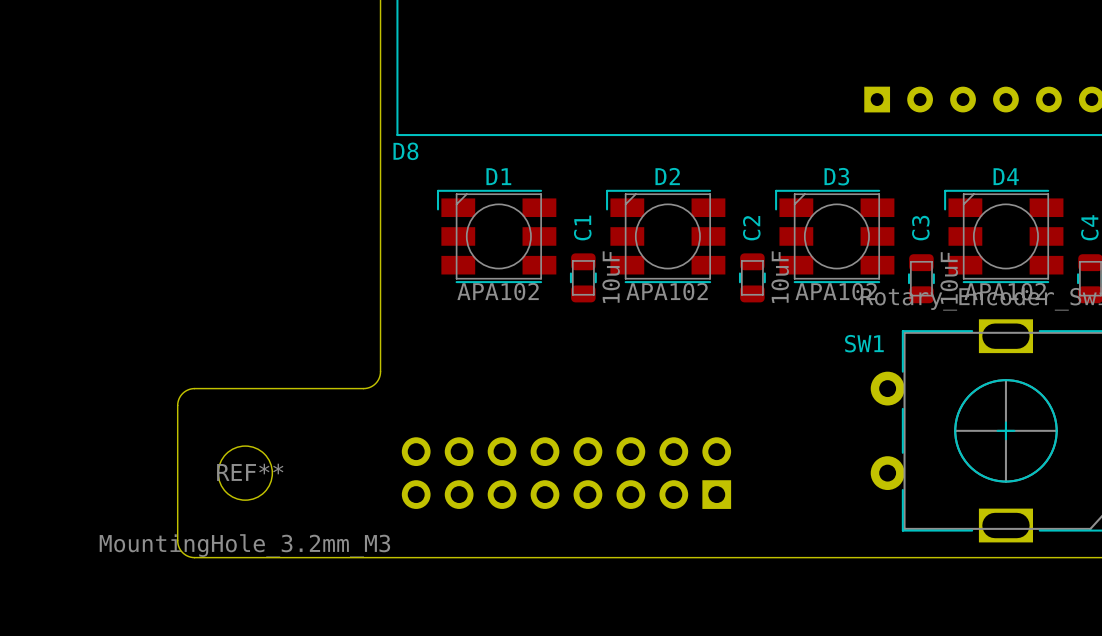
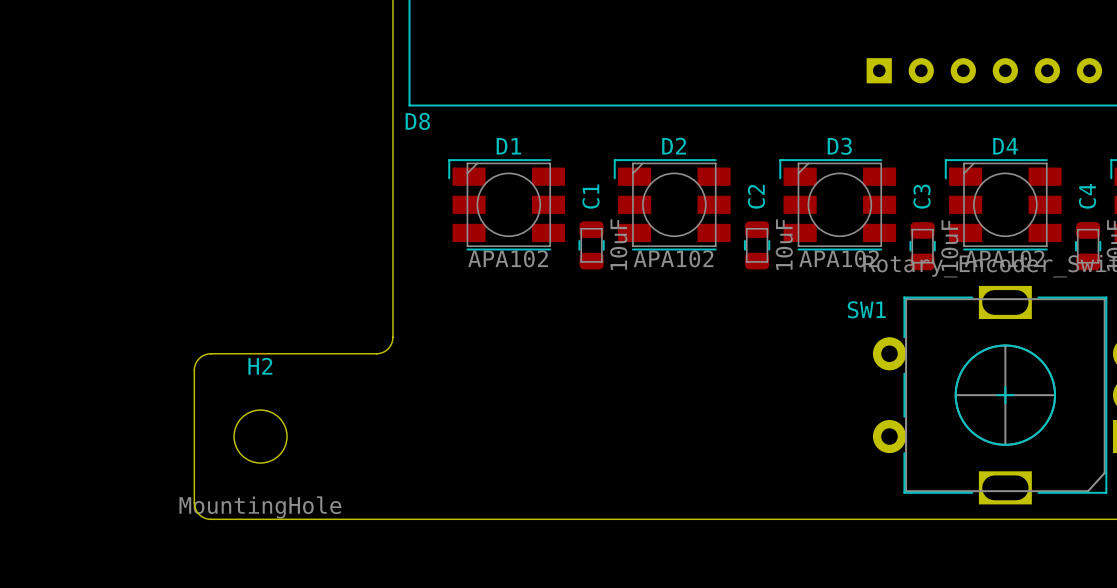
REF** name: REF** (250, 472) -> H2 (260, 366)
part: (566, 473) -> none
REF** value: MountingHole_3.2mm_M3 (244, 545) -> MountingHole (260, 507)

